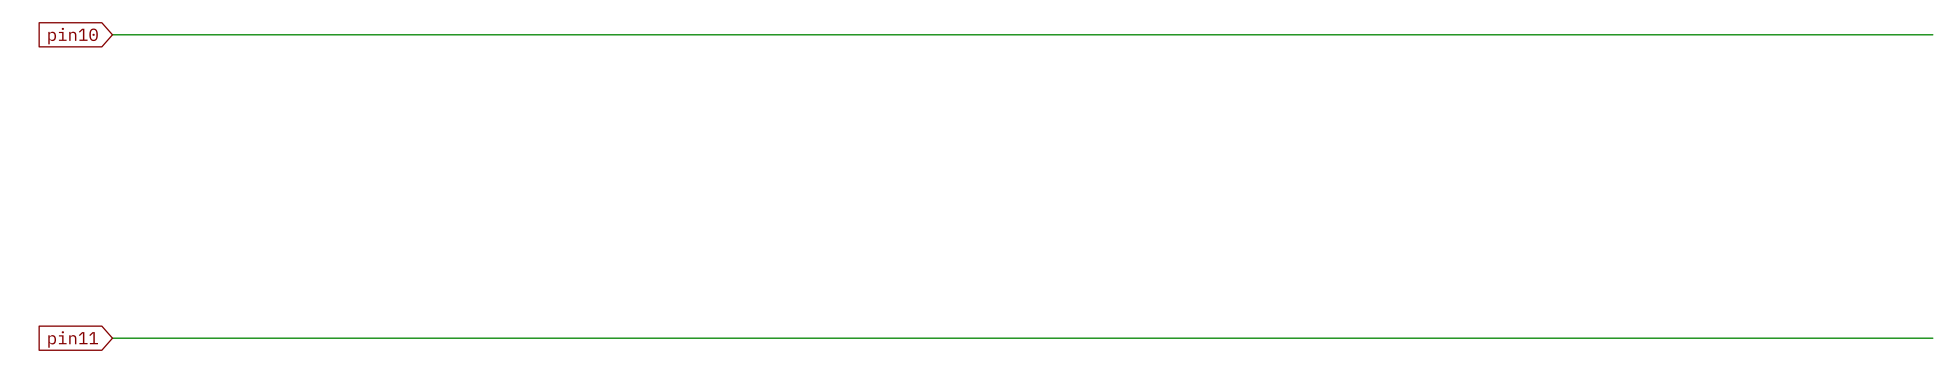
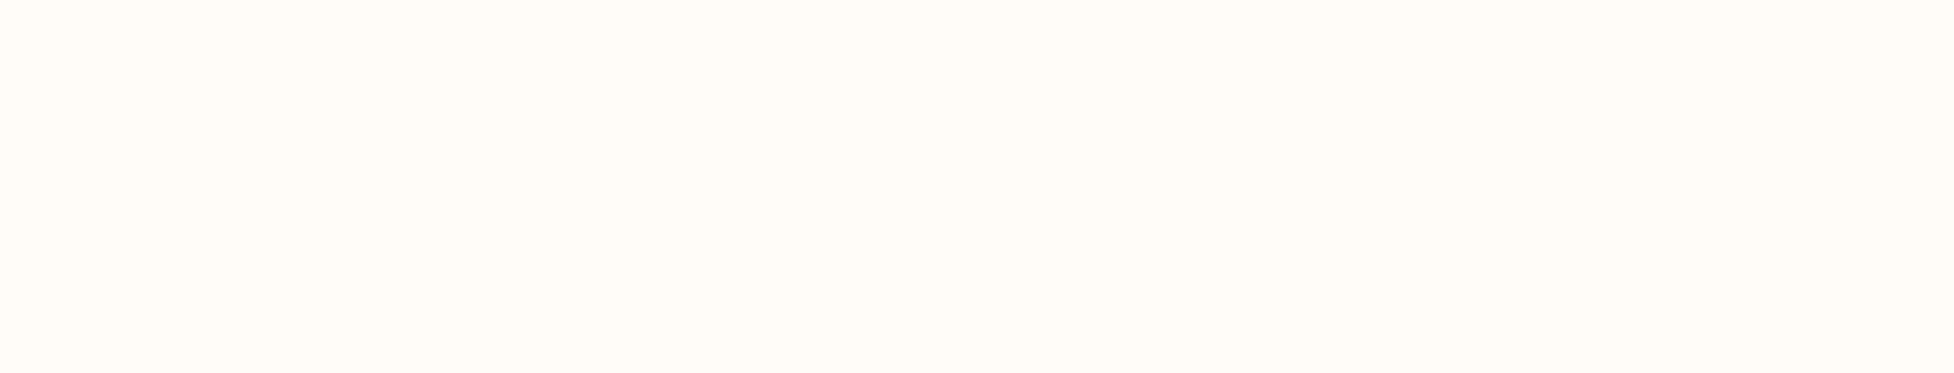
wire: (112, 34) (1932, 34) -> none
global label: pin10 (73, 36) -> none
wire: (112, 338) (1932, 338) -> none
global label: pin11 (73, 339) -> none

